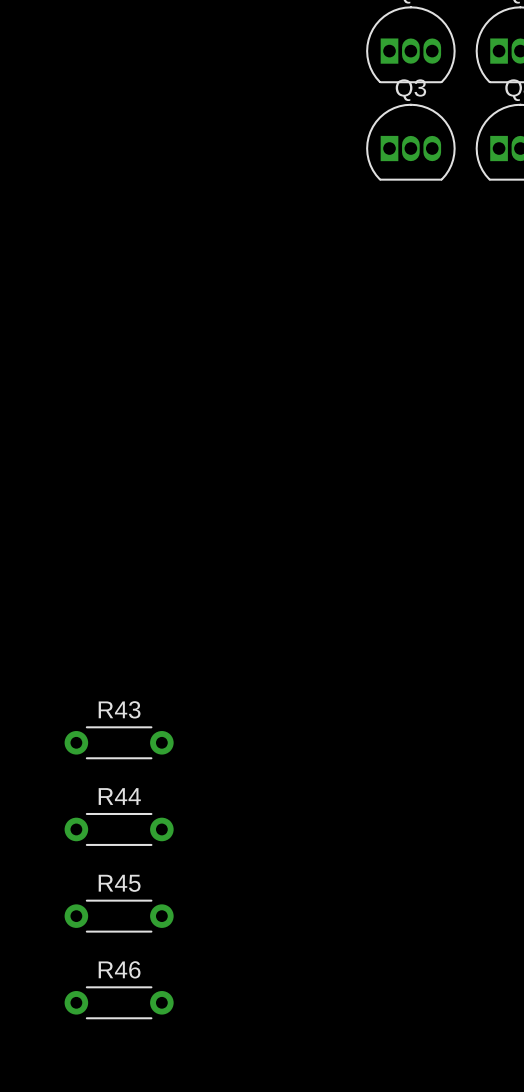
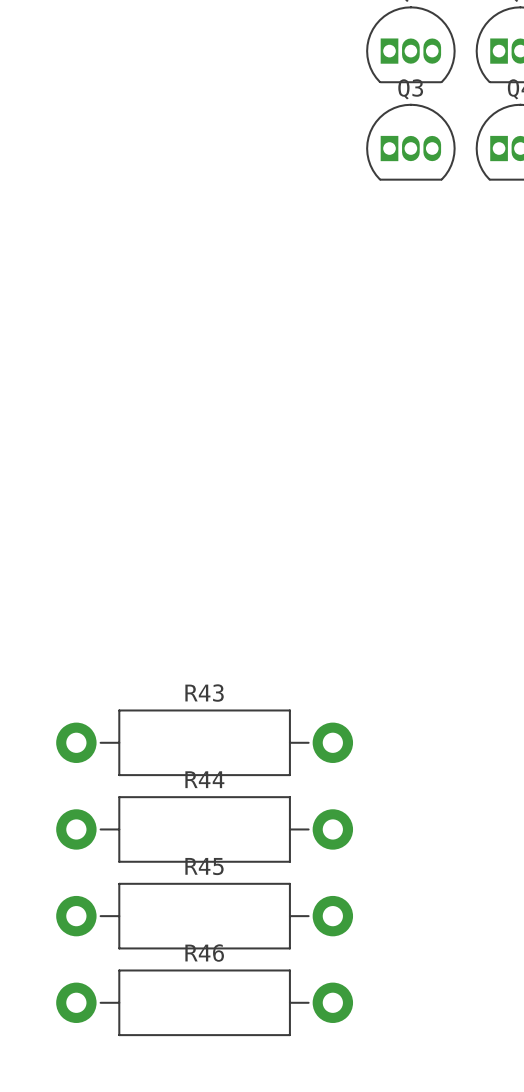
R43 footprint: [64, 726, 174, 760] -> [56, 709, 354, 777]
R44 footprint: [64, 812, 174, 846] -> [56, 796, 354, 863]
R45 footprint: [64, 899, 174, 933] -> [56, 882, 354, 950]
R46 footprint: [64, 986, 174, 1020] -> [56, 969, 354, 1037]

